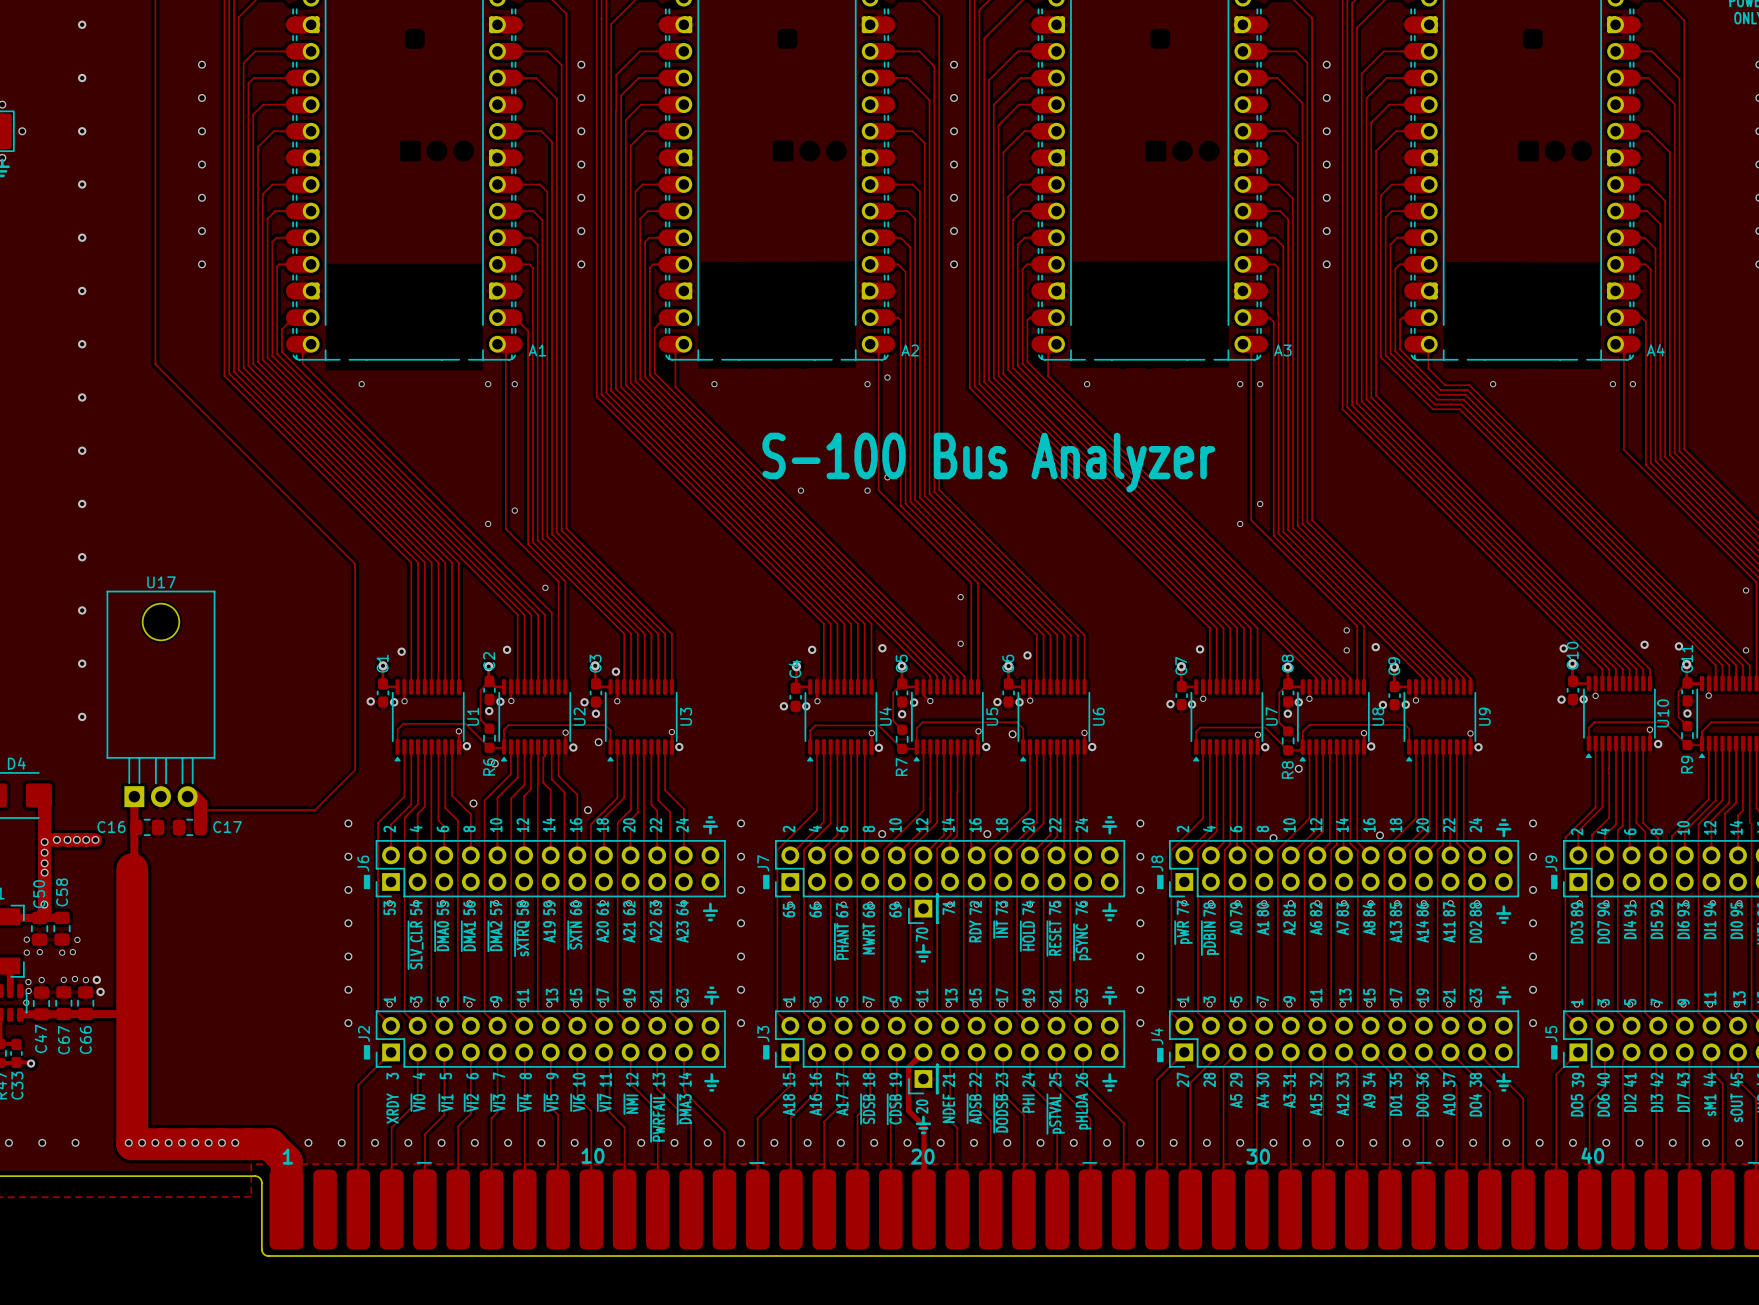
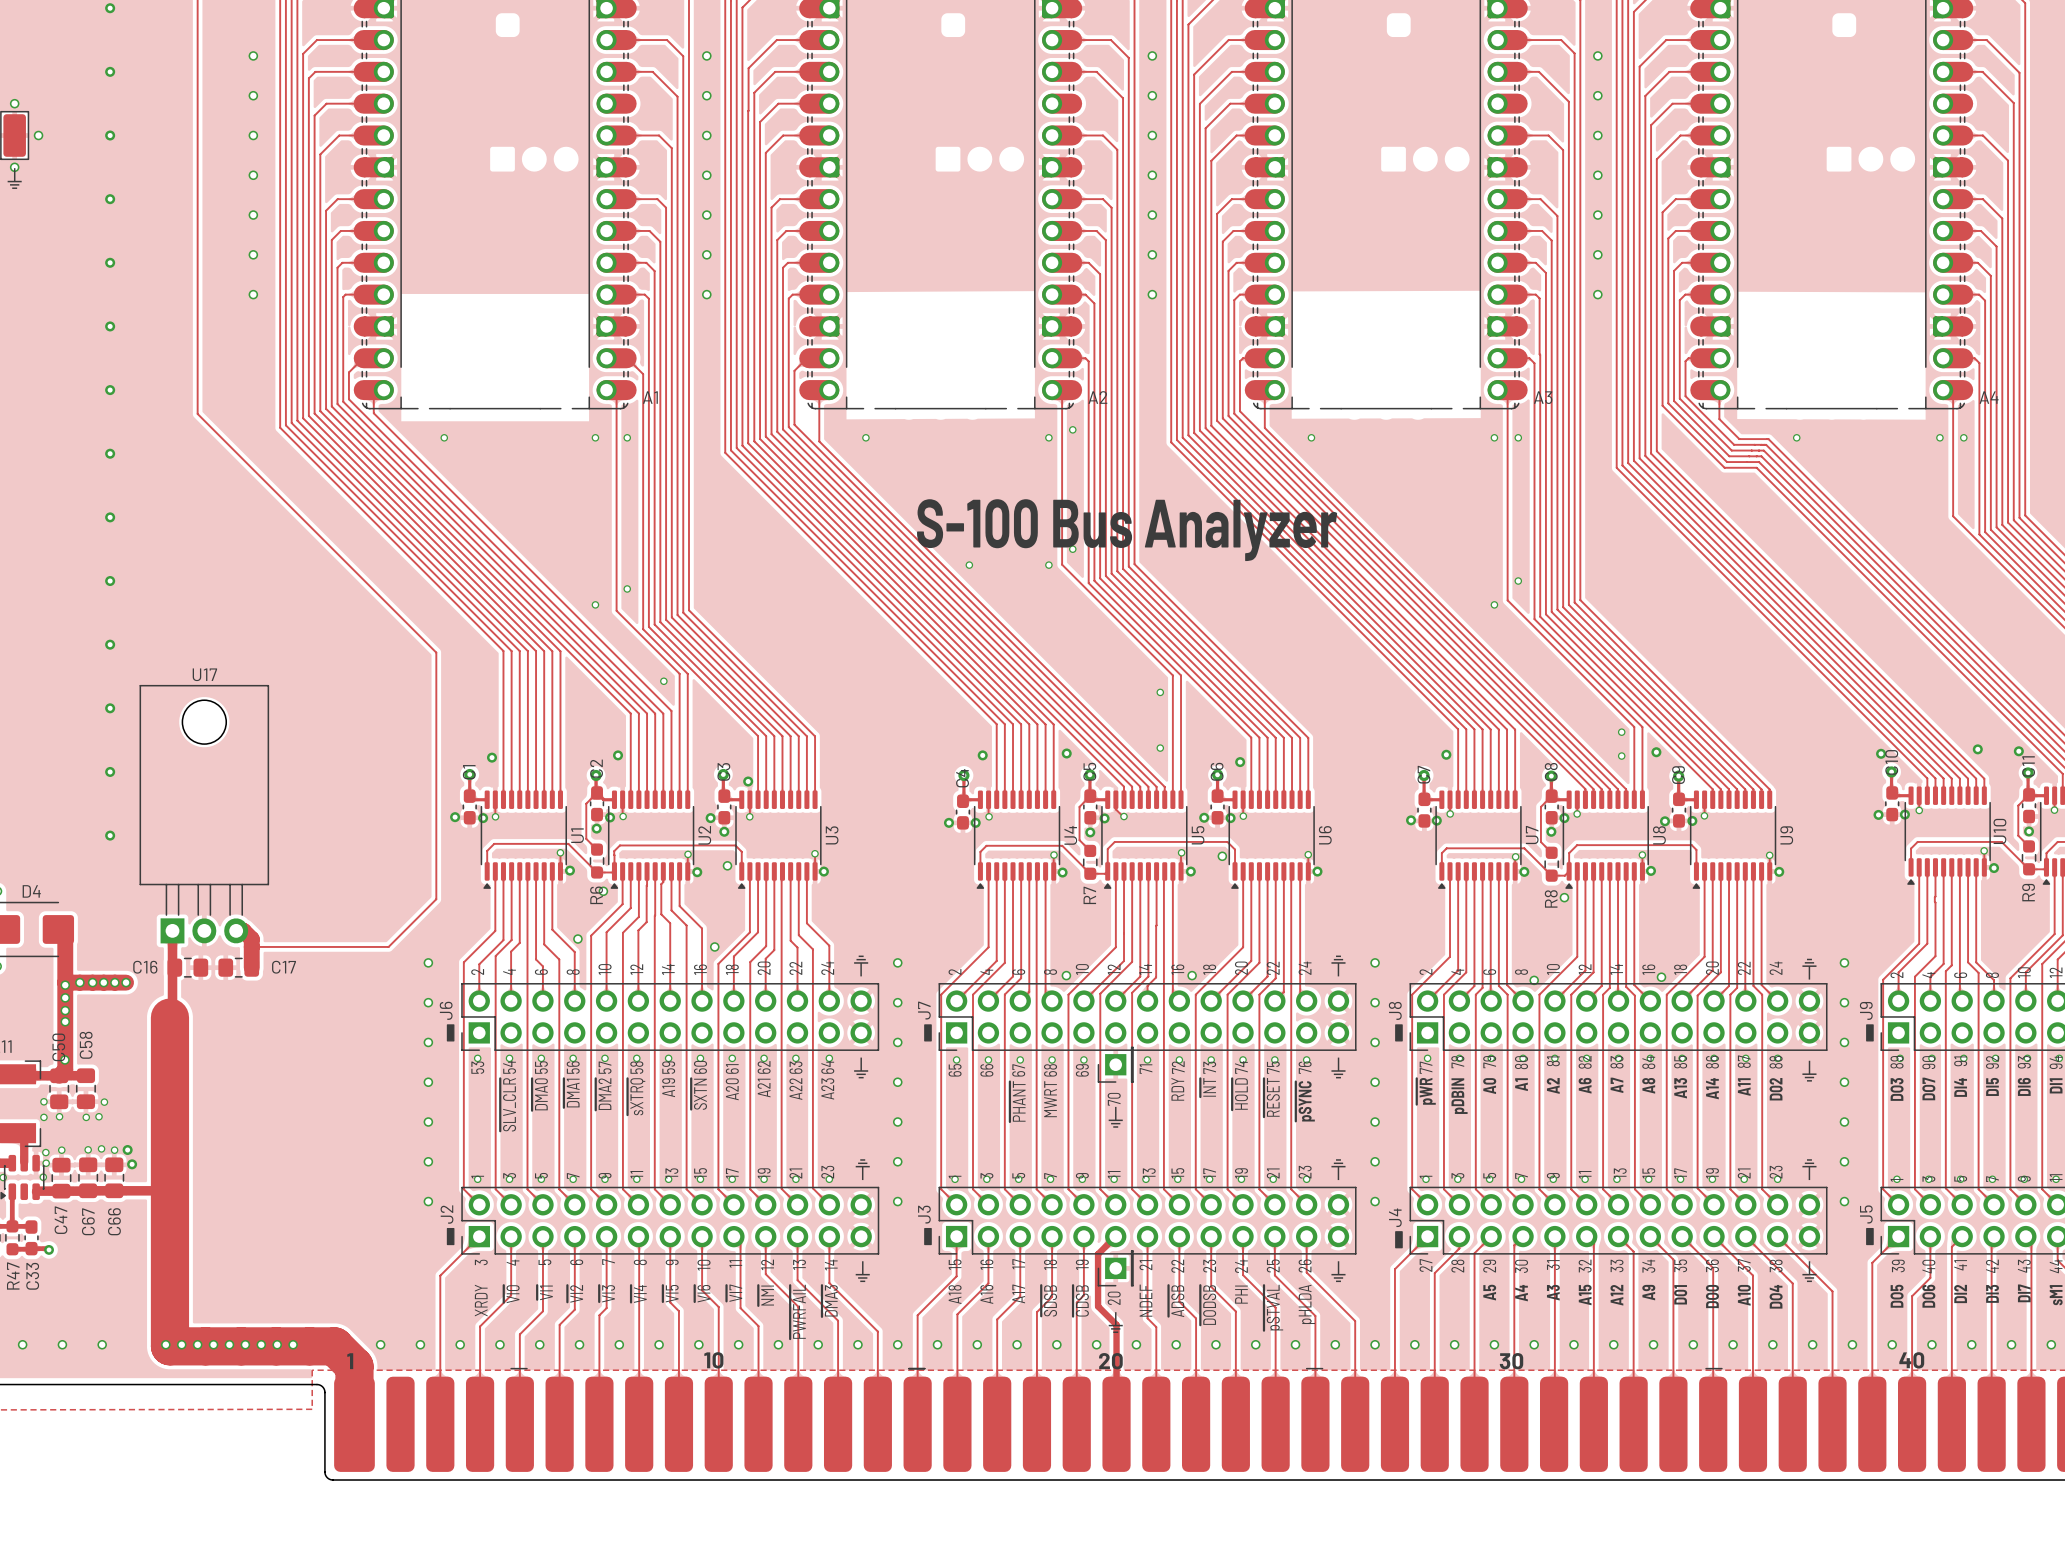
text: ~{pDBIN} (1210, 938) -> pDBIN (1459, 1096)

